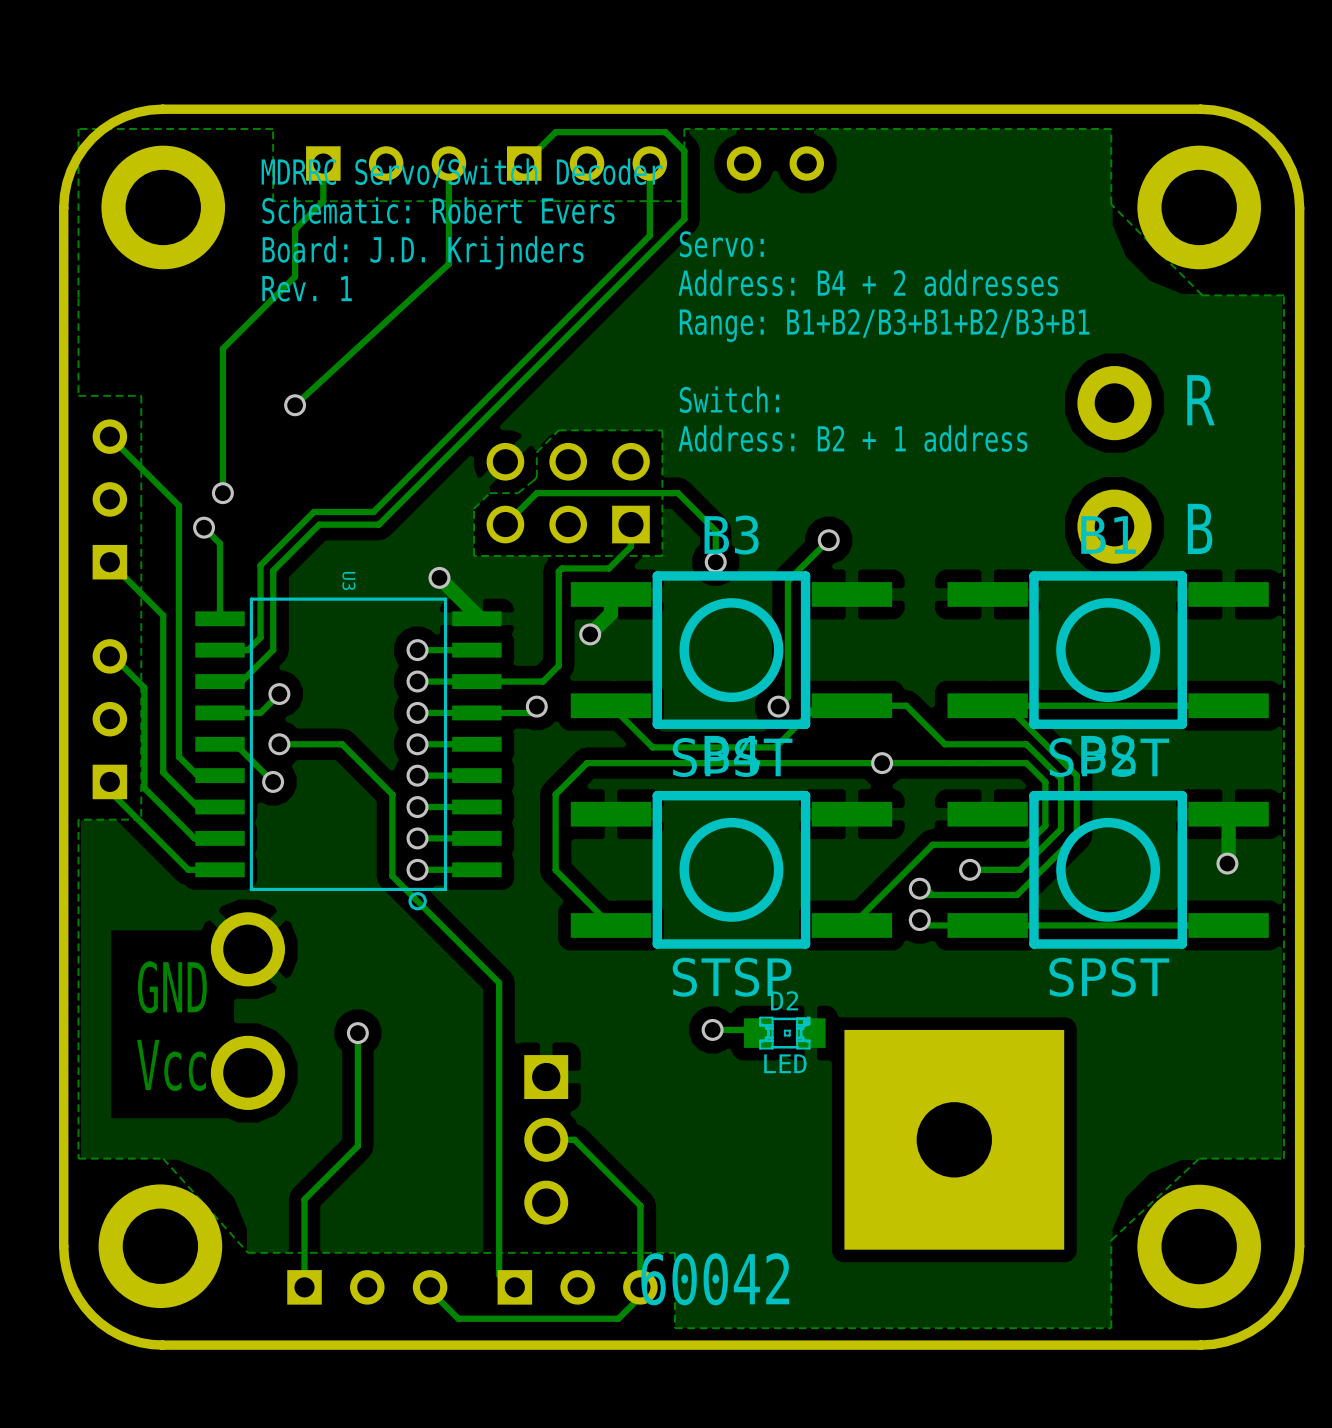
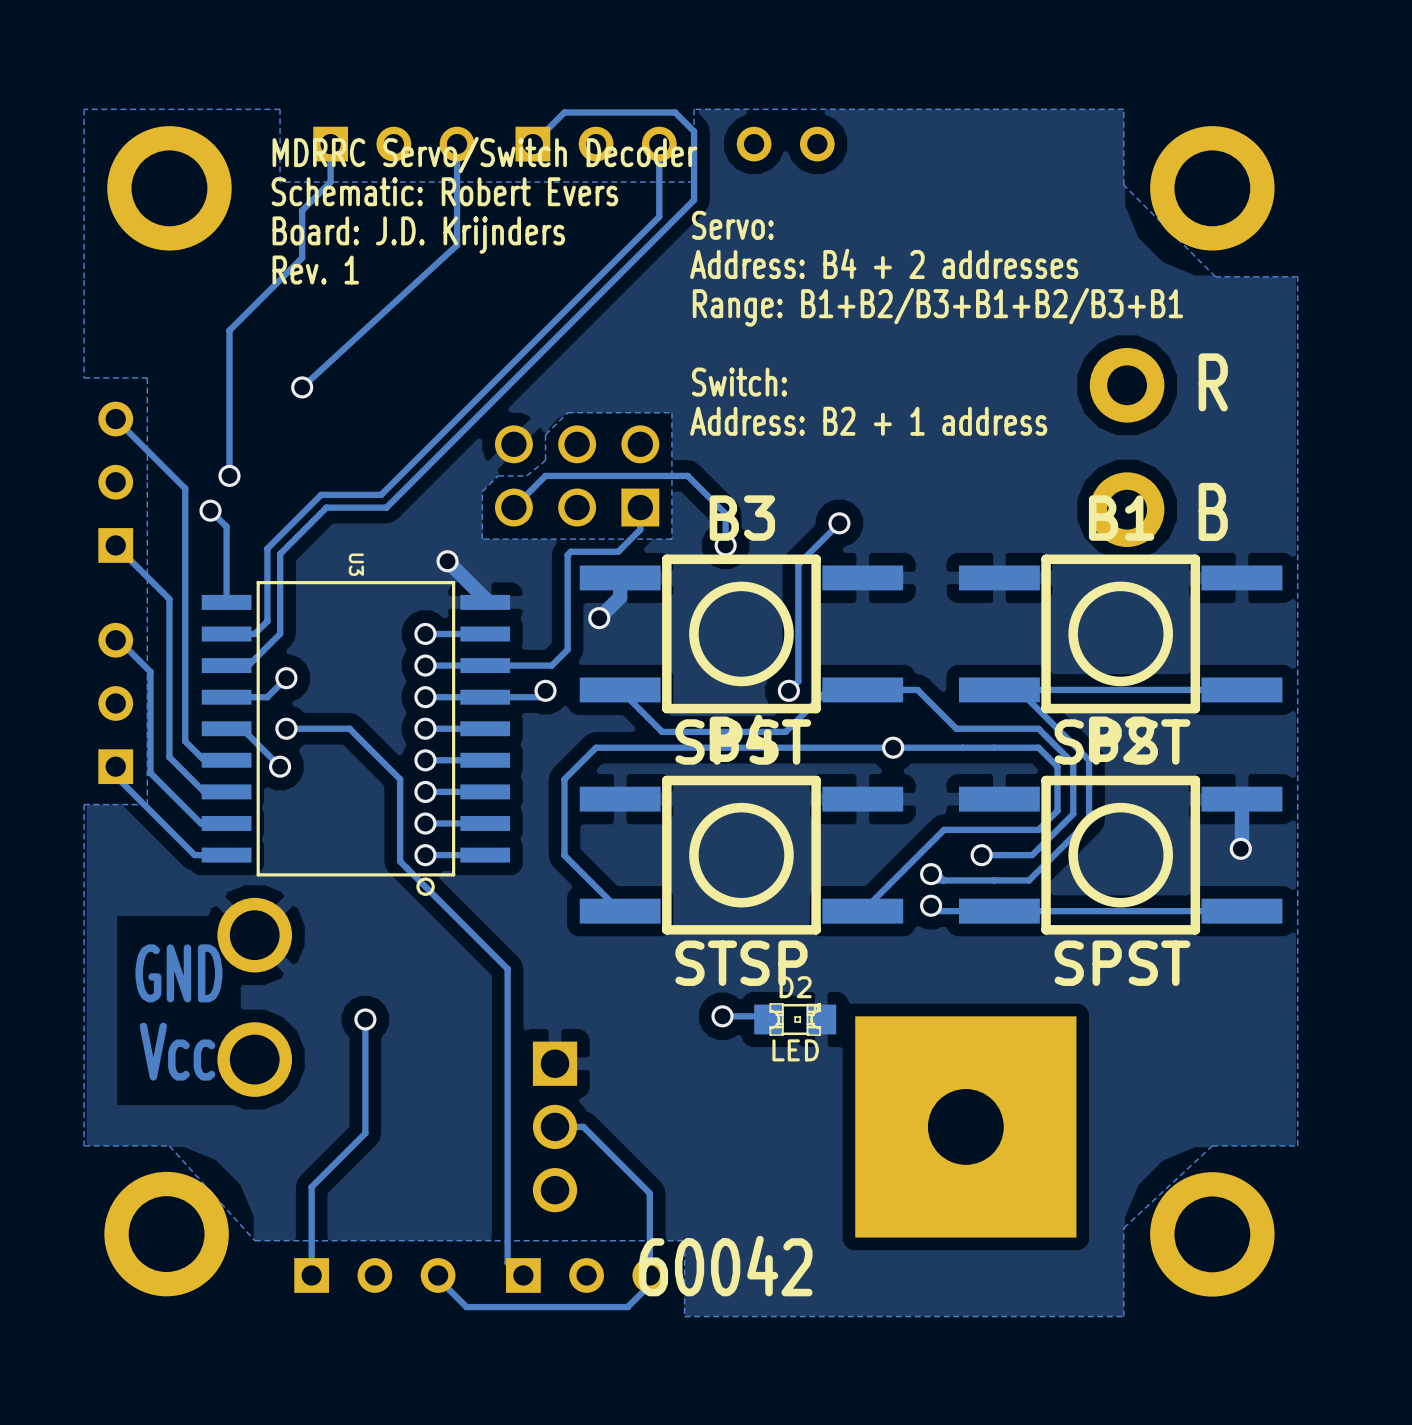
board edge: (1200, 109) (162, 109) (149, 110) (124, 116) (113, 122) (92, 138) (84, 147) (71, 170) (67, 182) (63, 208) (63, 1246) (66, 1268) (73, 1289) (92, 1316) (109, 1329) (129, 1339) (162, 1345) (1200, 1345) (1226, 1341) (1238, 1337) (1260, 1324) (1270, 1316) (1286, 1295) (1292, 1284) (1296, 1271) (1299, 1246) (1299, 208) (1296, 182) (1292, 170) (1279, 147) (1270, 138) (1250, 122) (1238, 116) (1213, 110) (1200, 109) -> none

